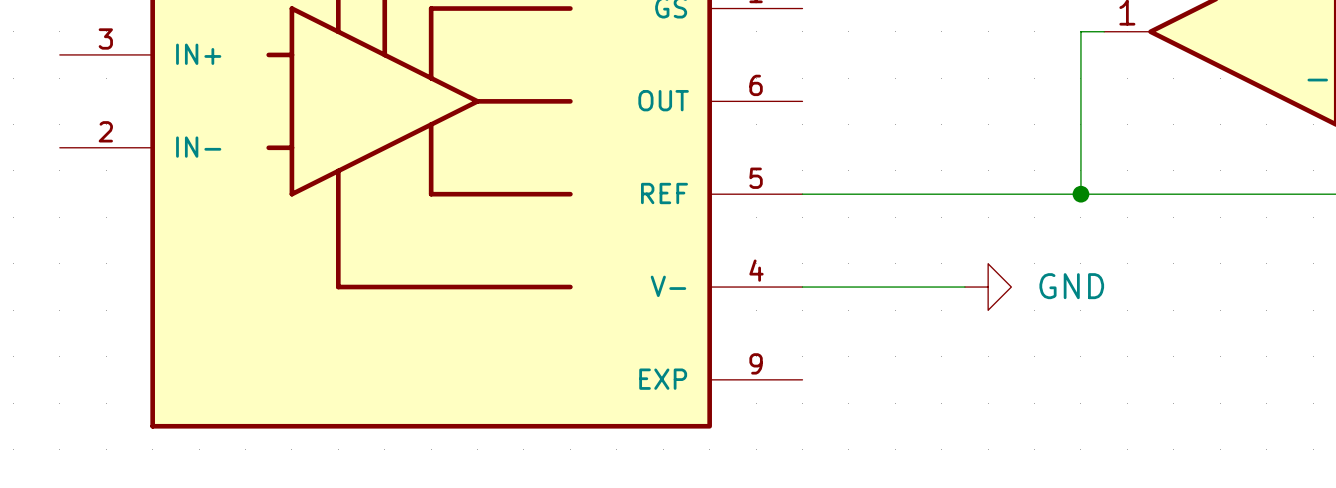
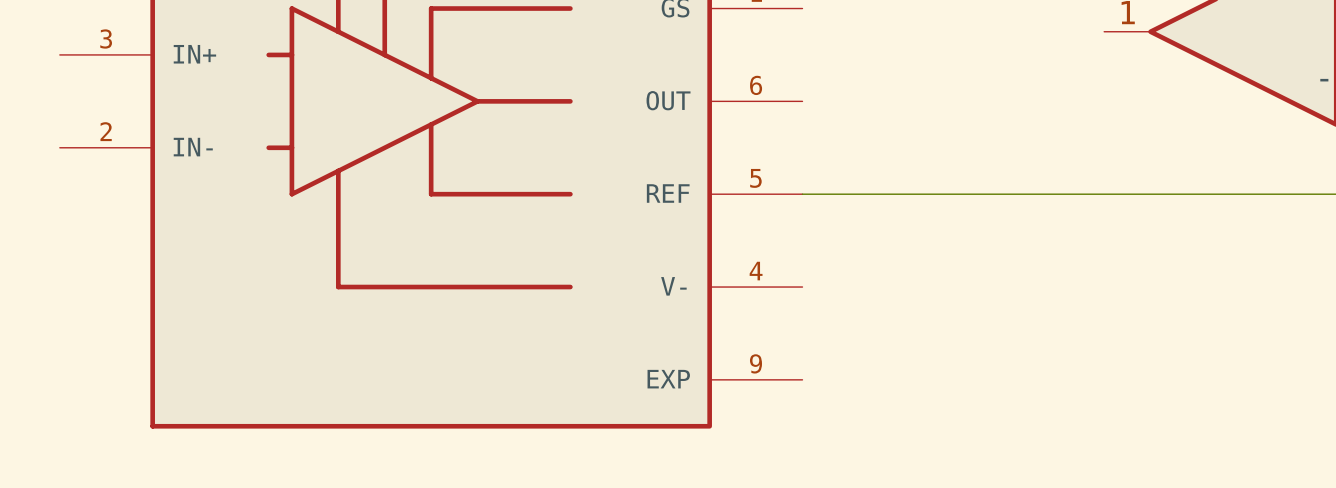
wire: (1104, 31) (1080, 31) (1080, 194) -> none
junction: (1080, 194) -> none
wire: (802, 287) (964, 287) -> none
power symbol: GND (988, 287) -> none

